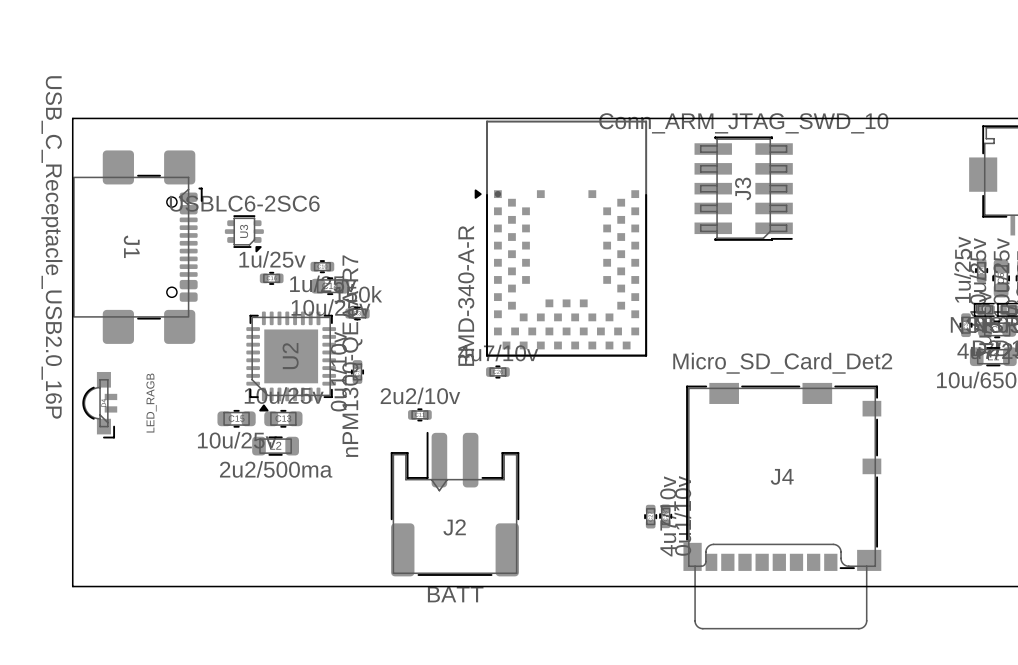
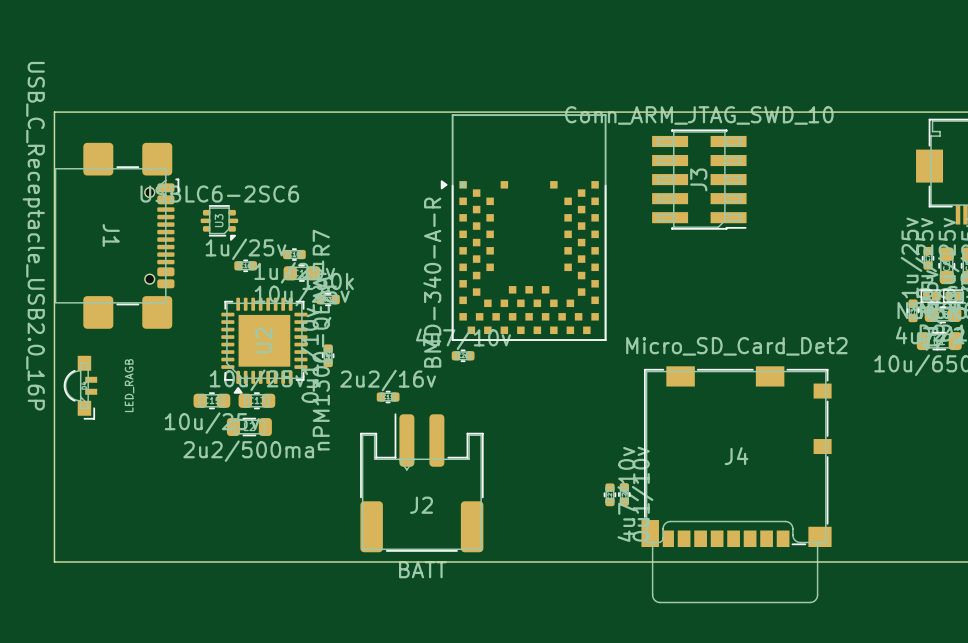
part value: 2u2/10v (420, 395) -> 2u2/16v (388, 380)

